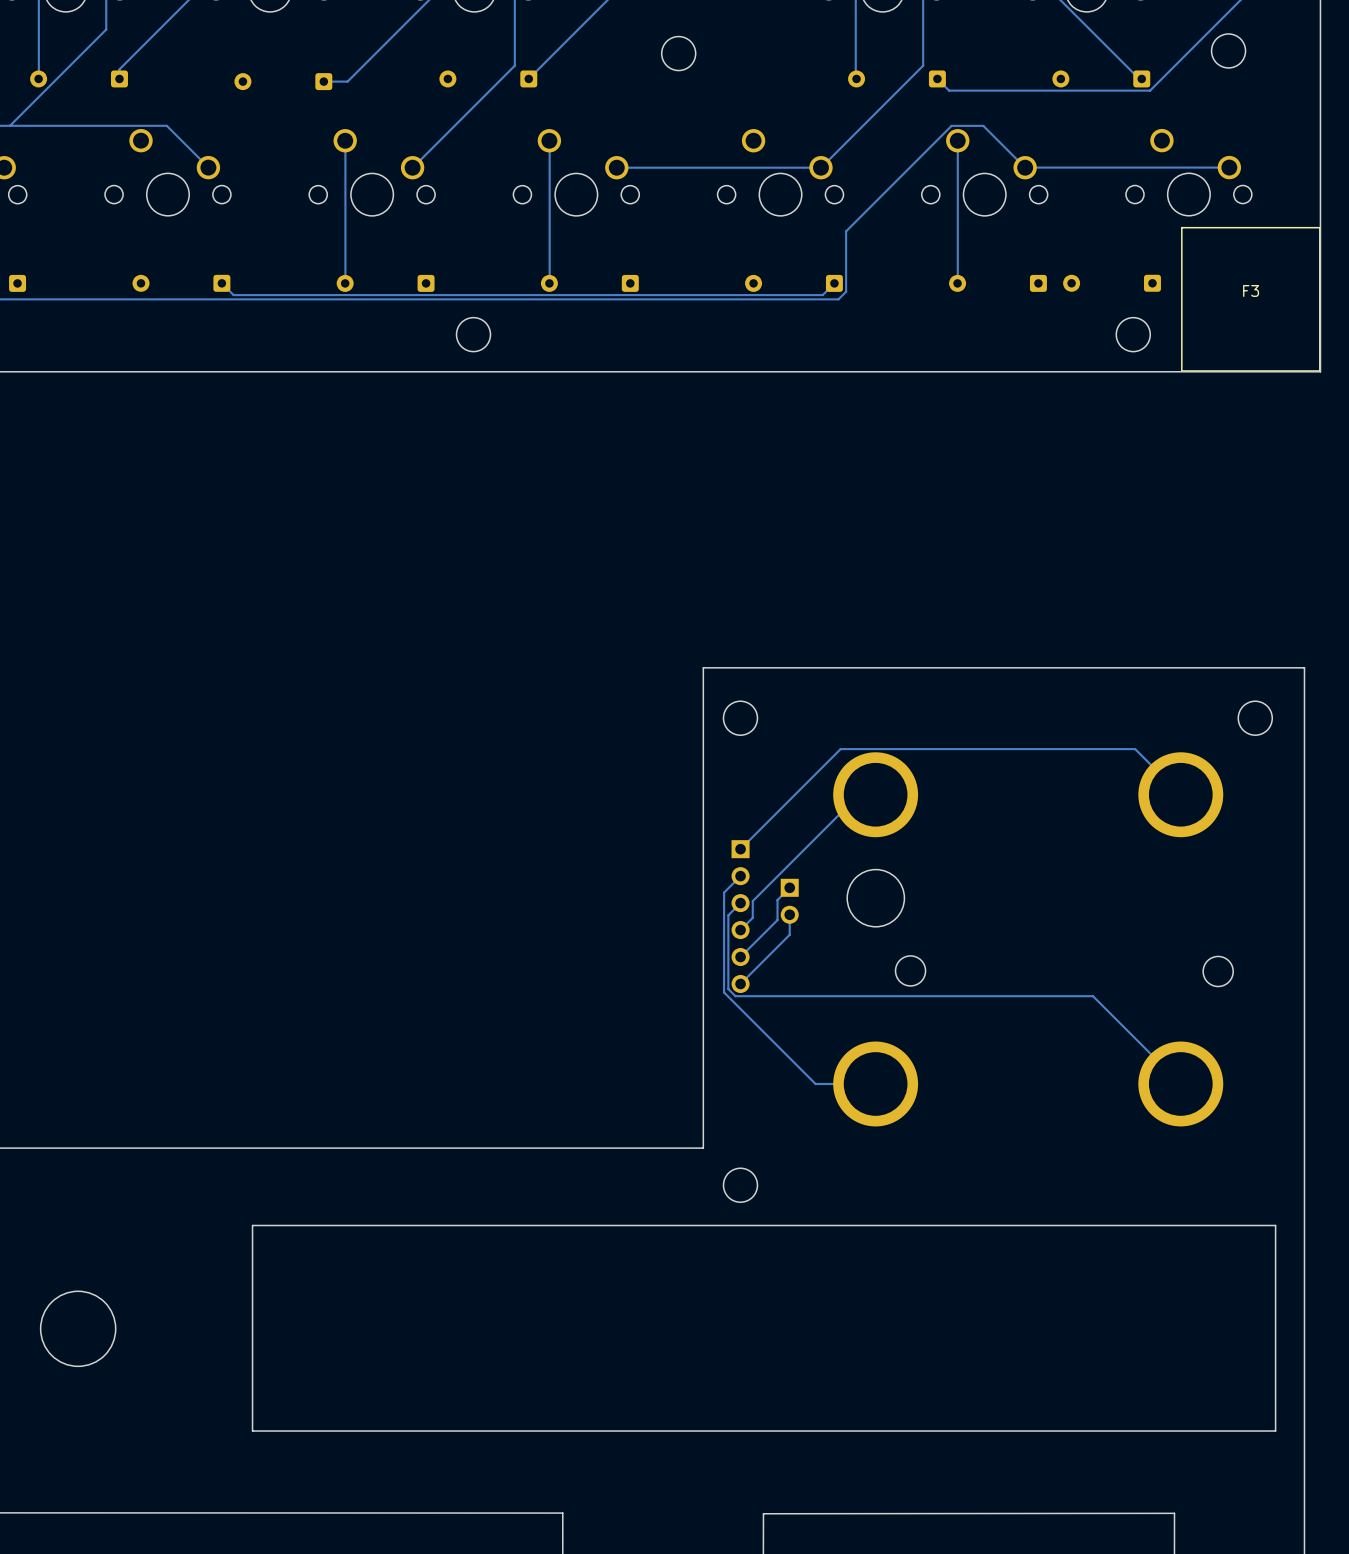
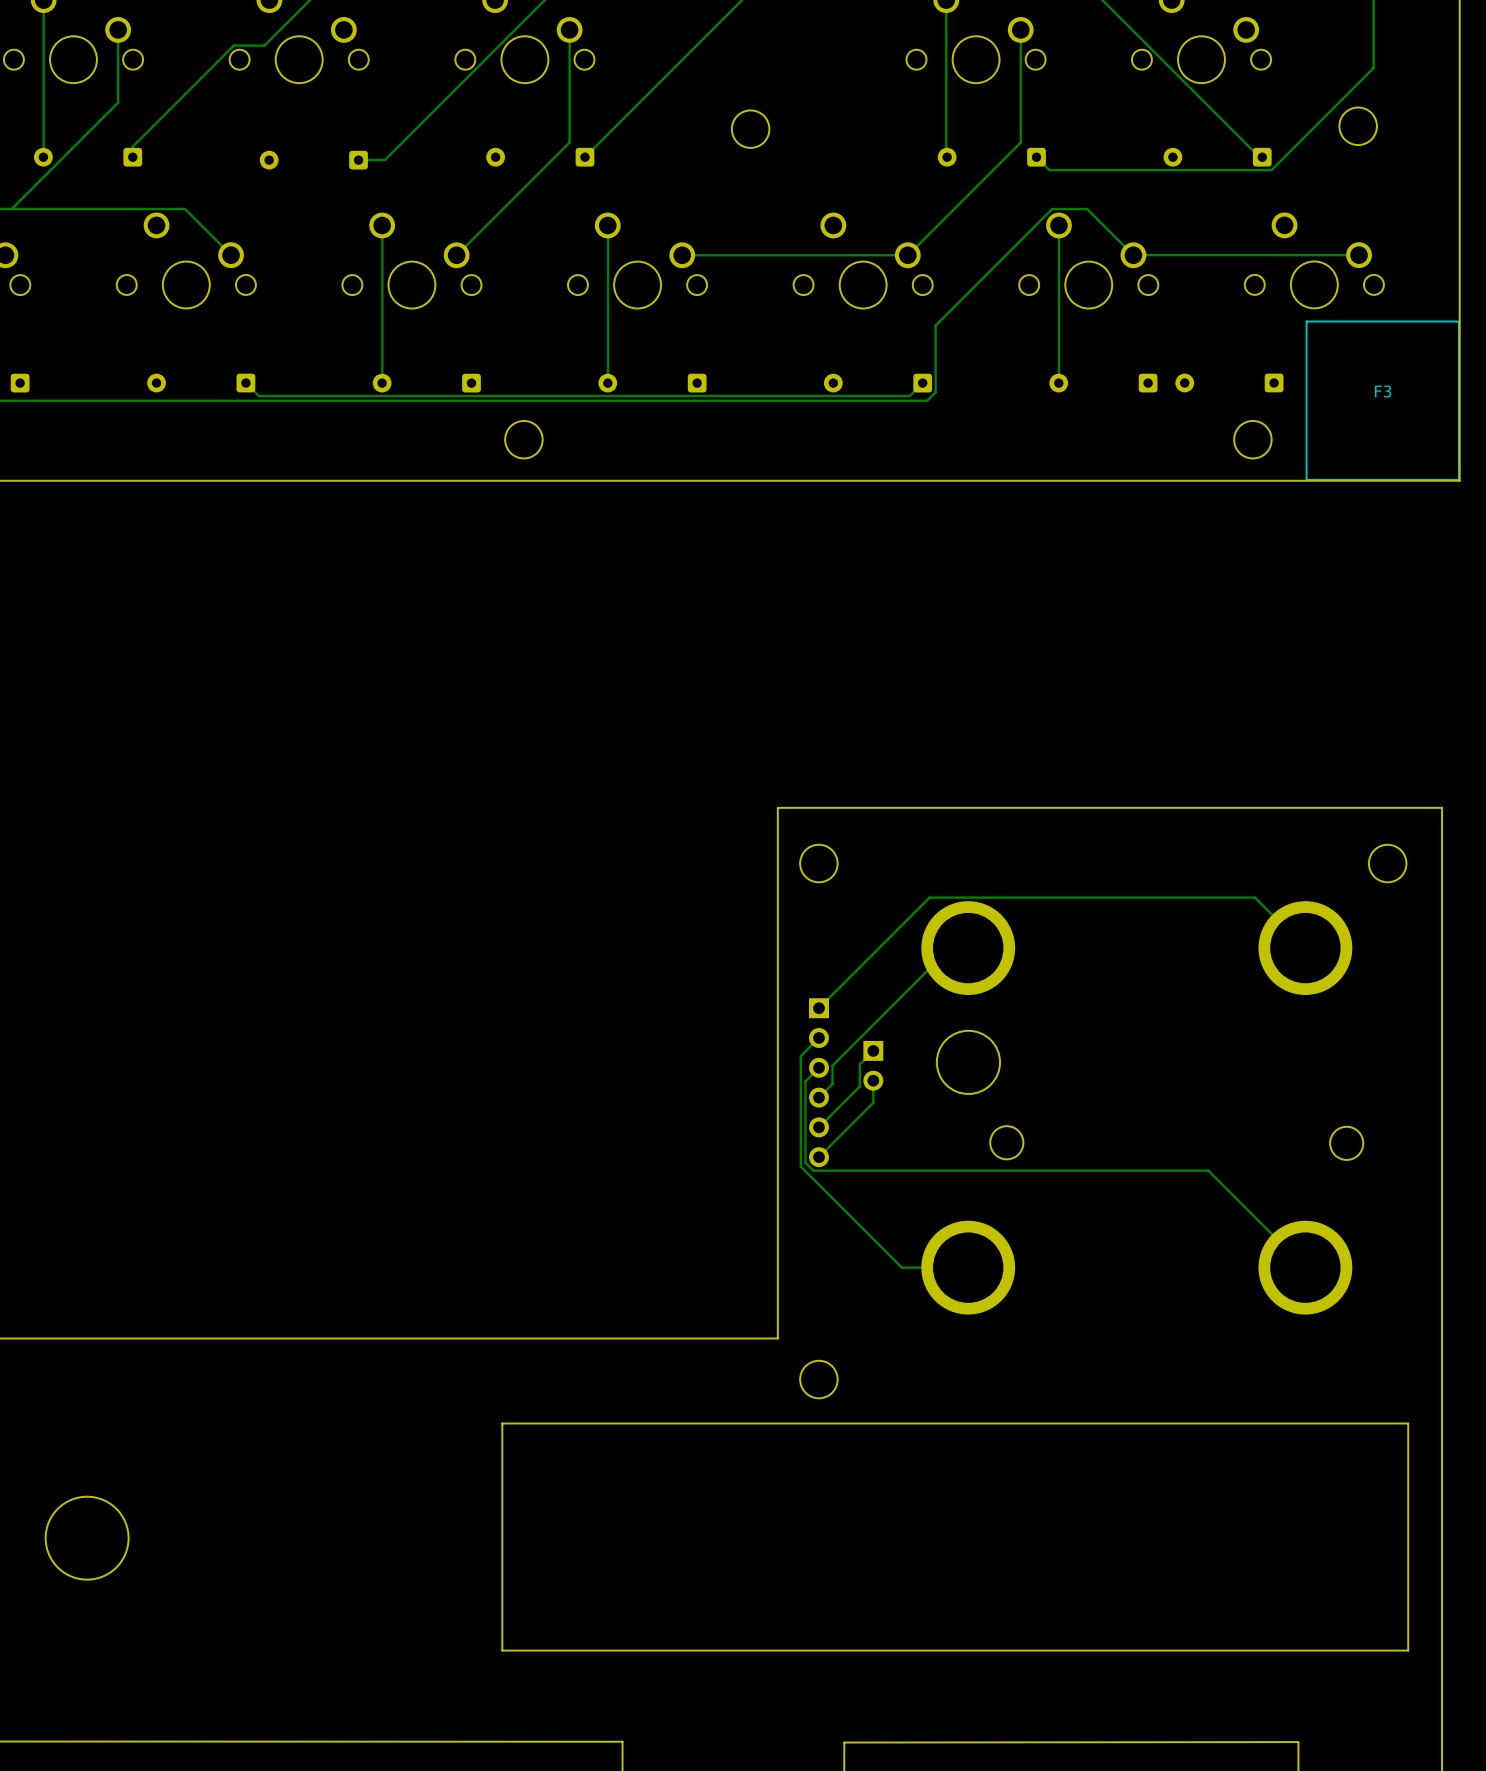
board edge: (1275, 1225) (252, 1225) (252, 1431) (1275, 1431) (1275, 1225) -> (1408, 1423) (1408, 1650) (502, 1650) (502, 1423) (1408, 1423)

